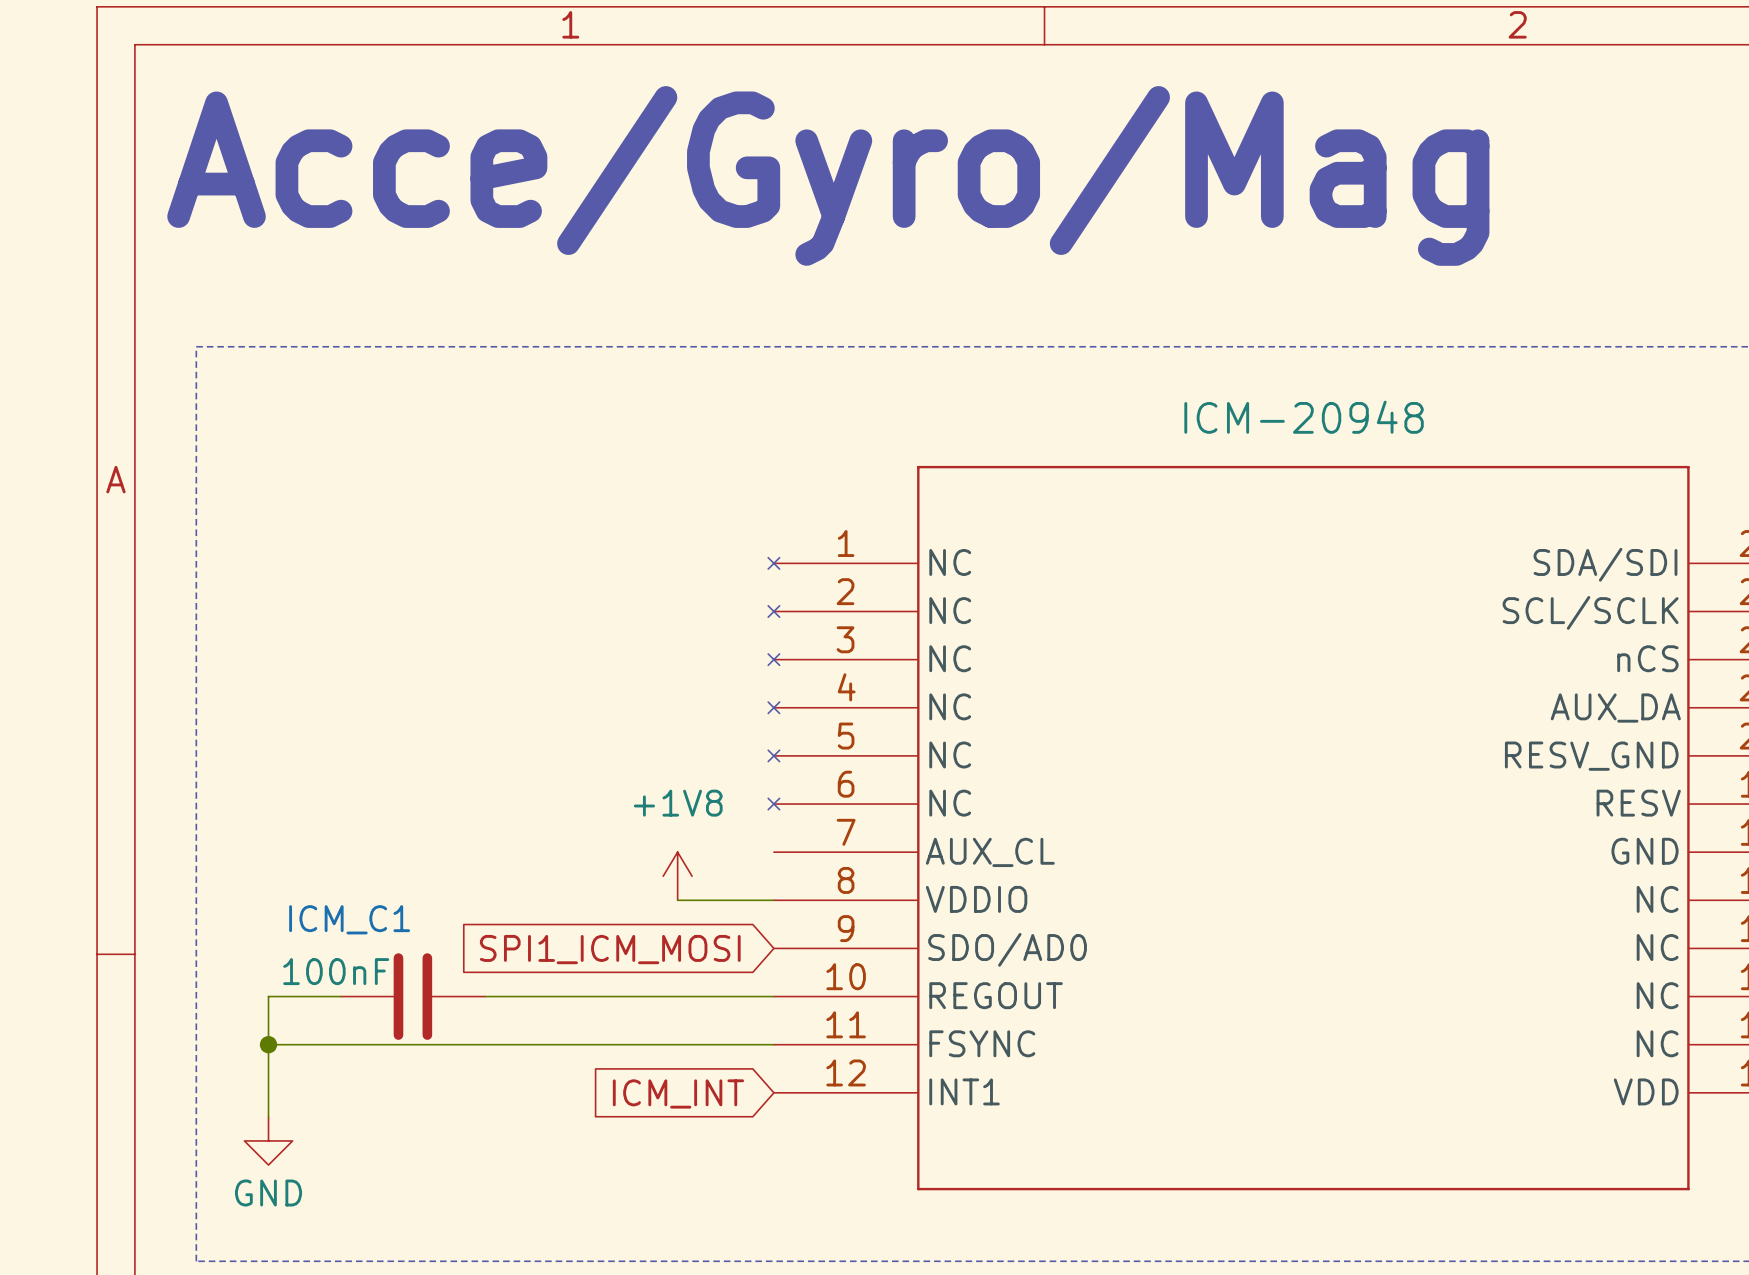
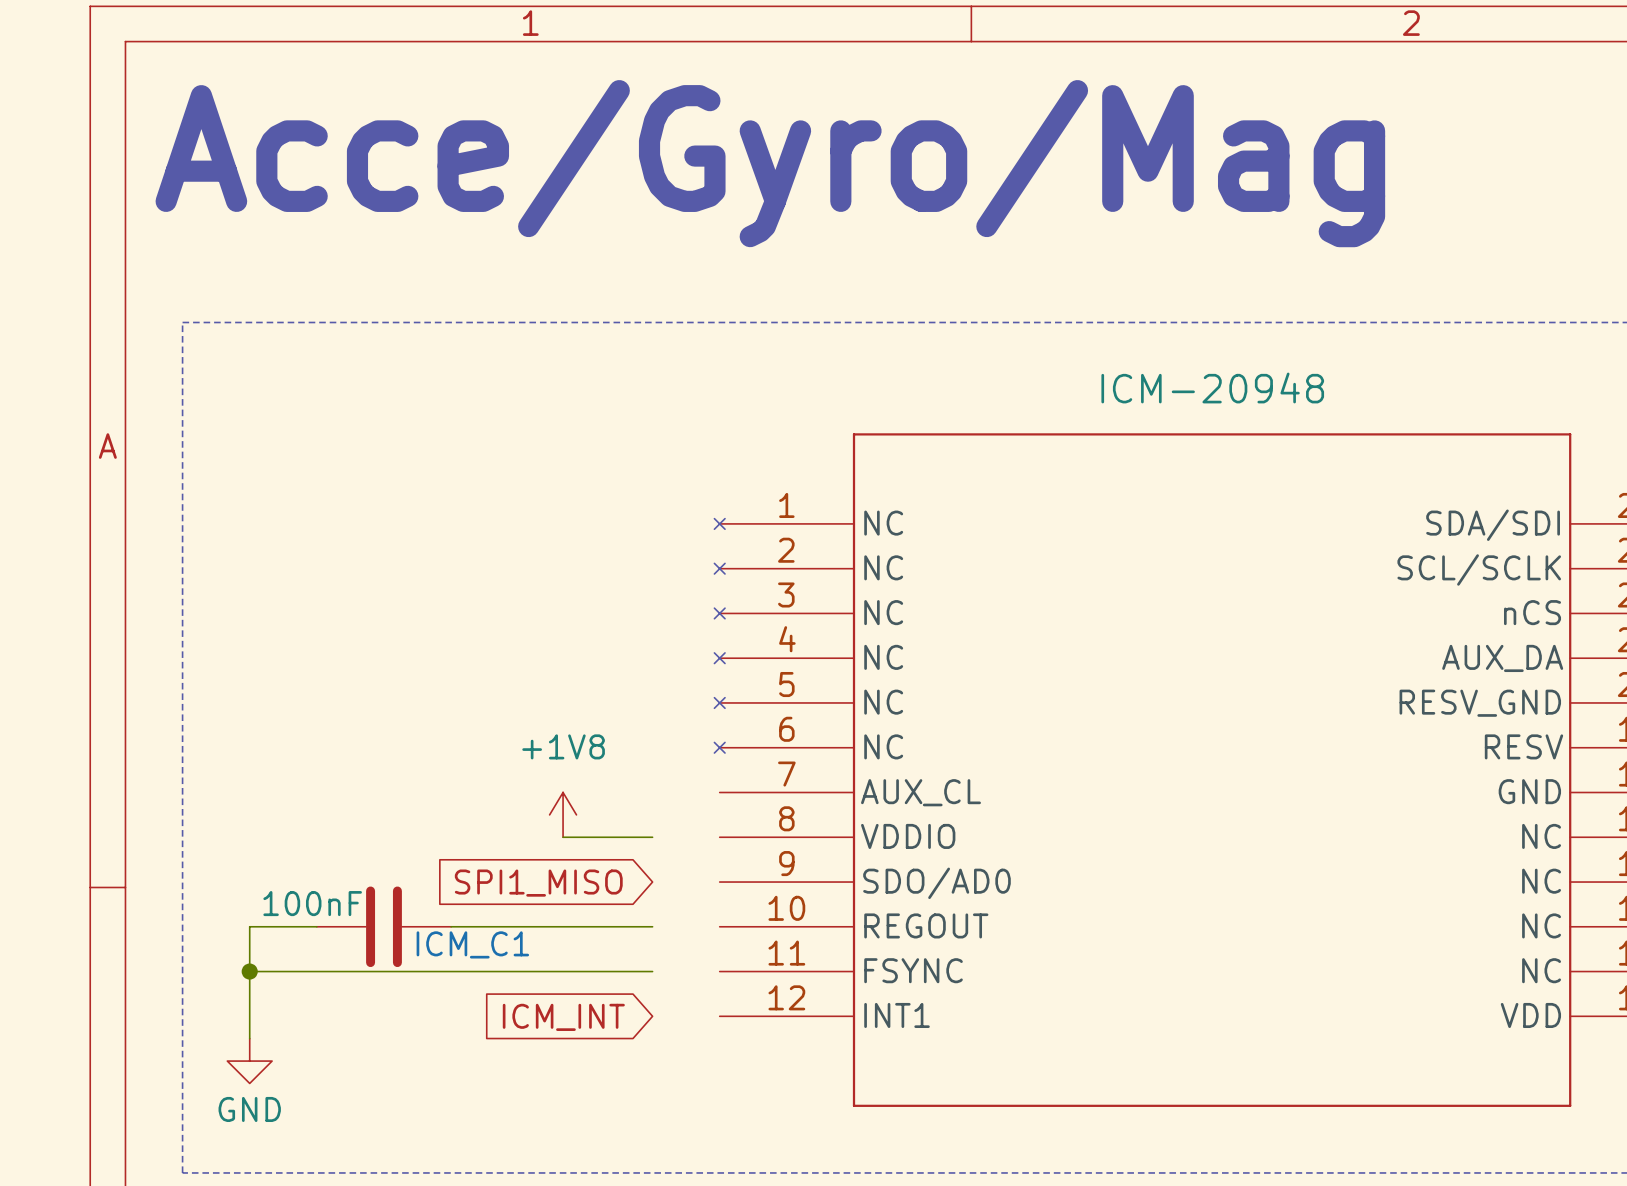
power symbol position: +1V8 (677, 876) -> +1V8 (563, 814)
wire: (701, 900) (773, 900) -> (563, 837) (630, 837)
ICM_C1 name position: ICM_C1 (349, 919) -> ICM_C1 (472, 944)
global label: SPI1_ICM_MOSI (610, 949) -> SPI1_MISO (538, 883)
wire: (701, 996) (773, 996) -> none
wire: (701, 1044) (773, 1044) -> none
global label position: ICM_INT (678, 1093) -> ICM_INT (563, 1017)

